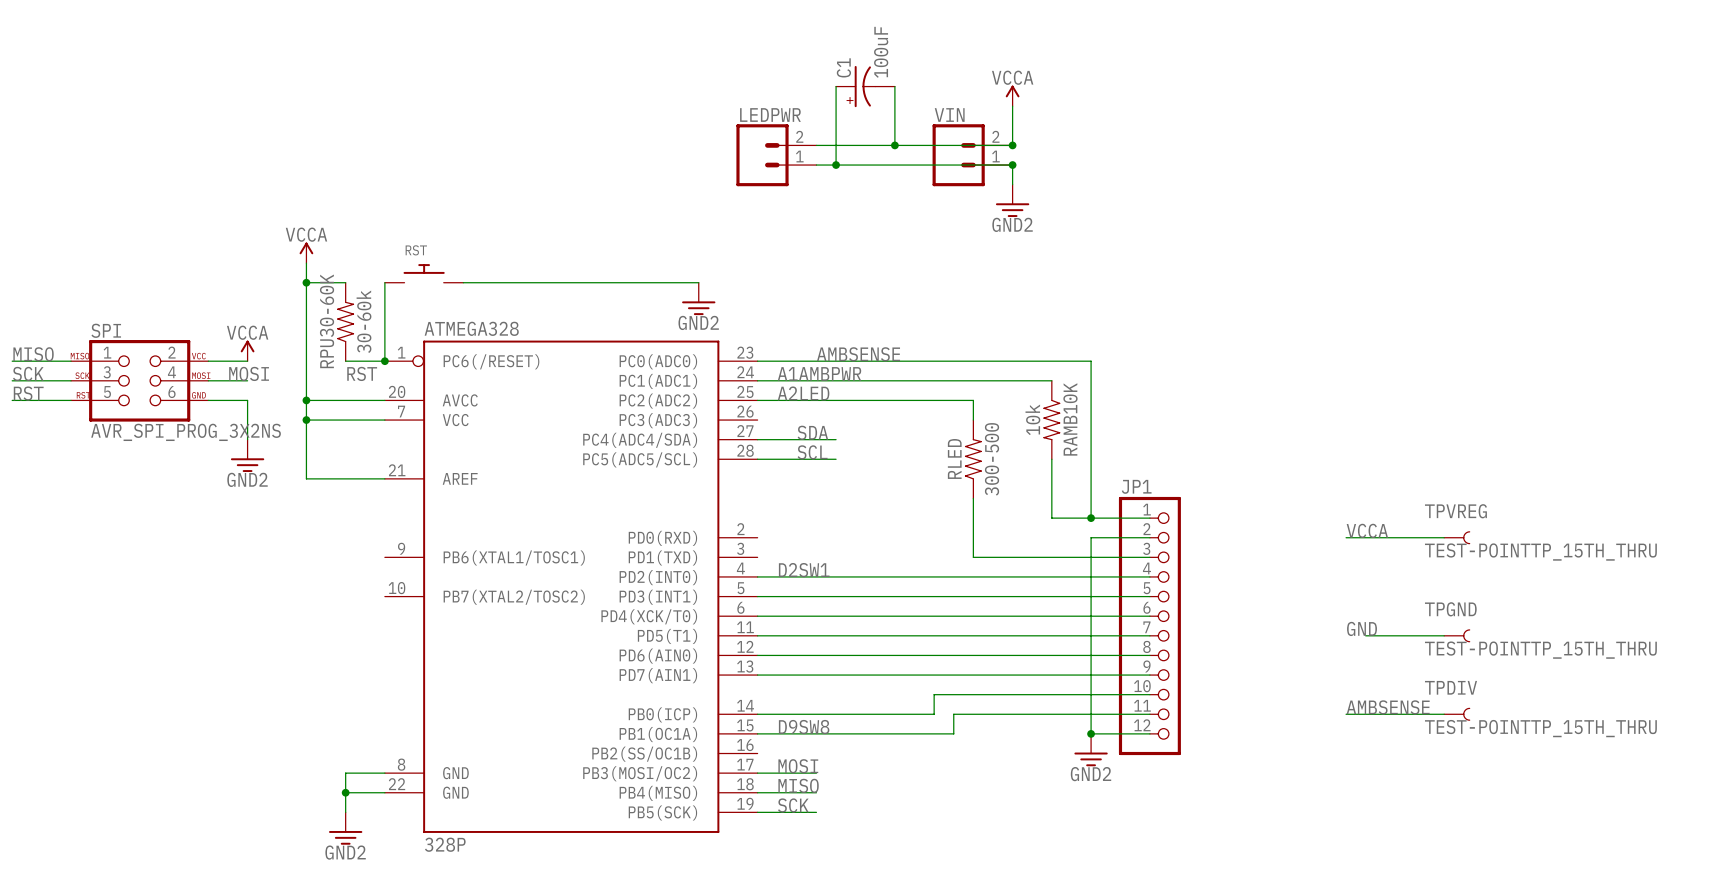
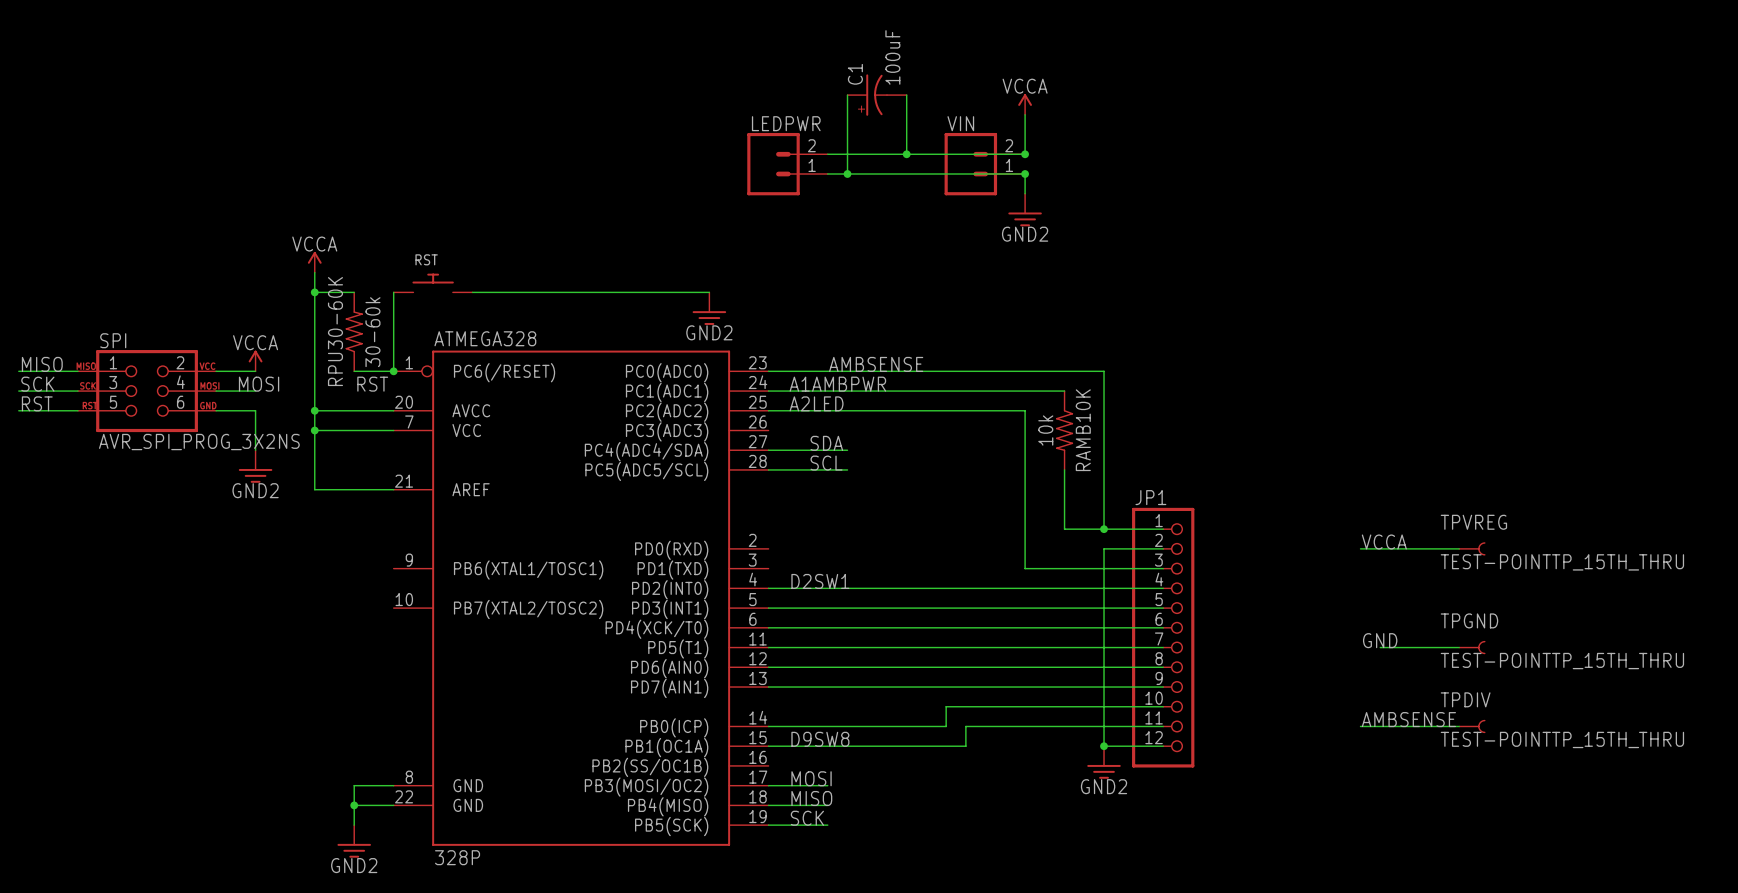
wire: (973, 400) (973, 420) -> none
RLED: 300-500 (973, 459) -> none
wire: (973, 498) (973, 557) (1012, 557) -> (985, 410) (1025, 410) (1025, 568)

